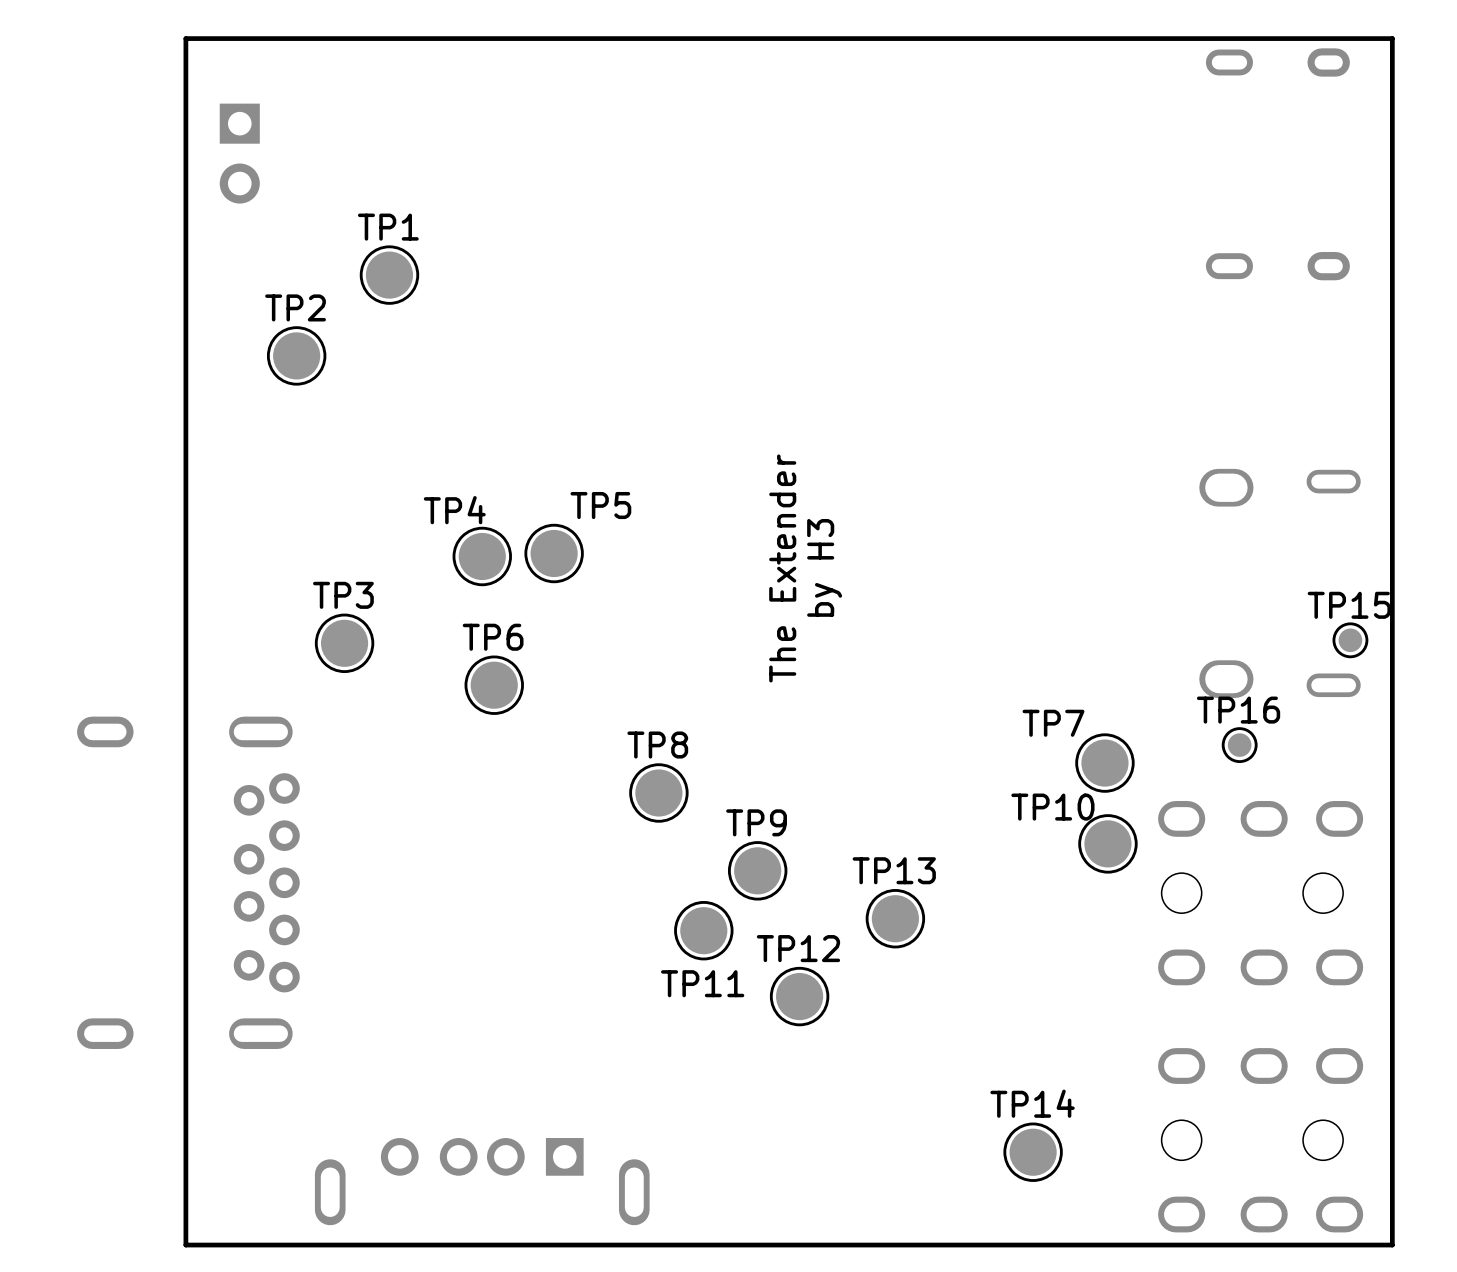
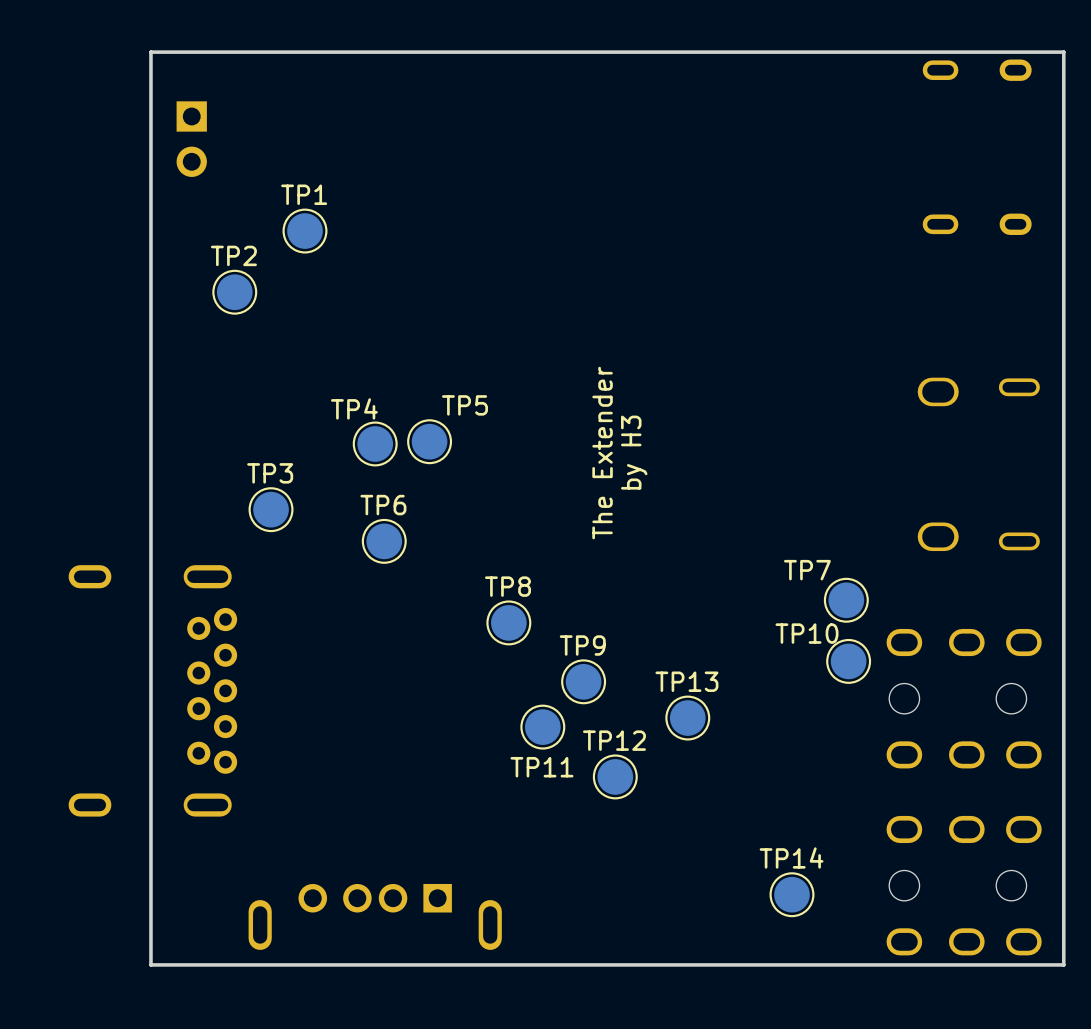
TP15: (1350, 640) -> none
TP16: (1239, 745) -> none

